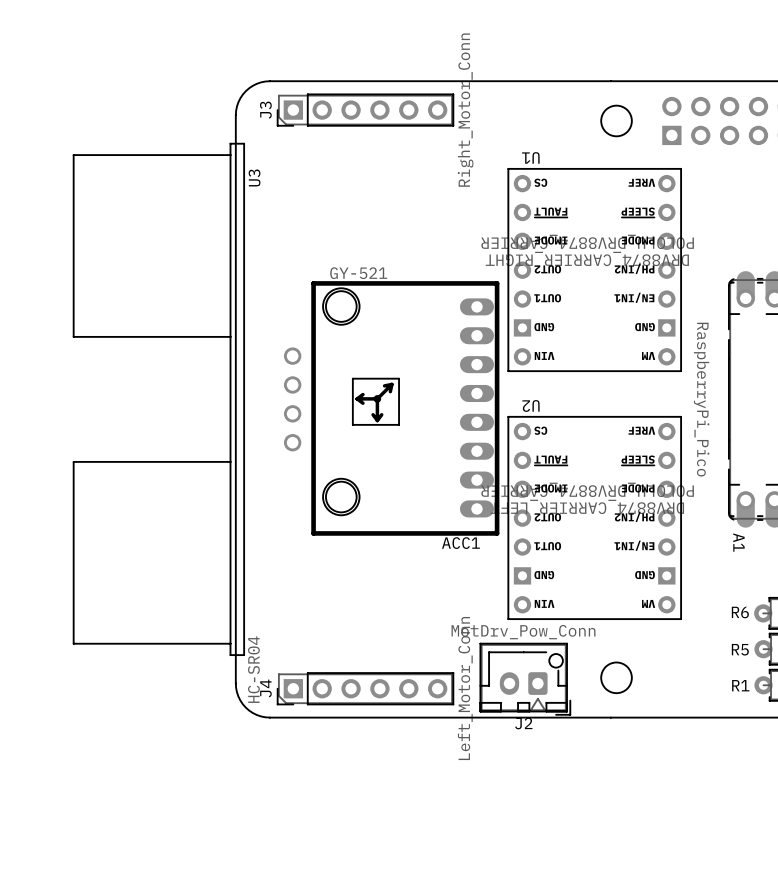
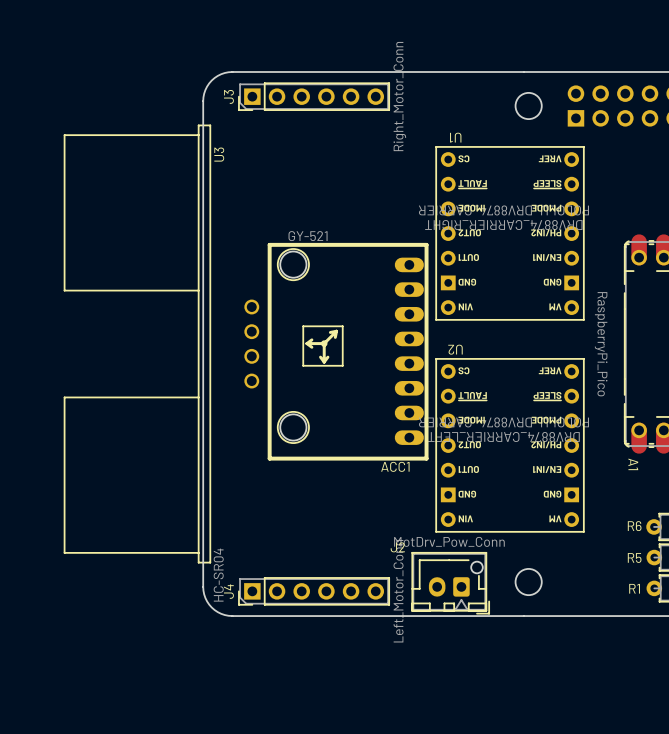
J2 name position: J2 (523, 723) -> J2 (397, 547)

